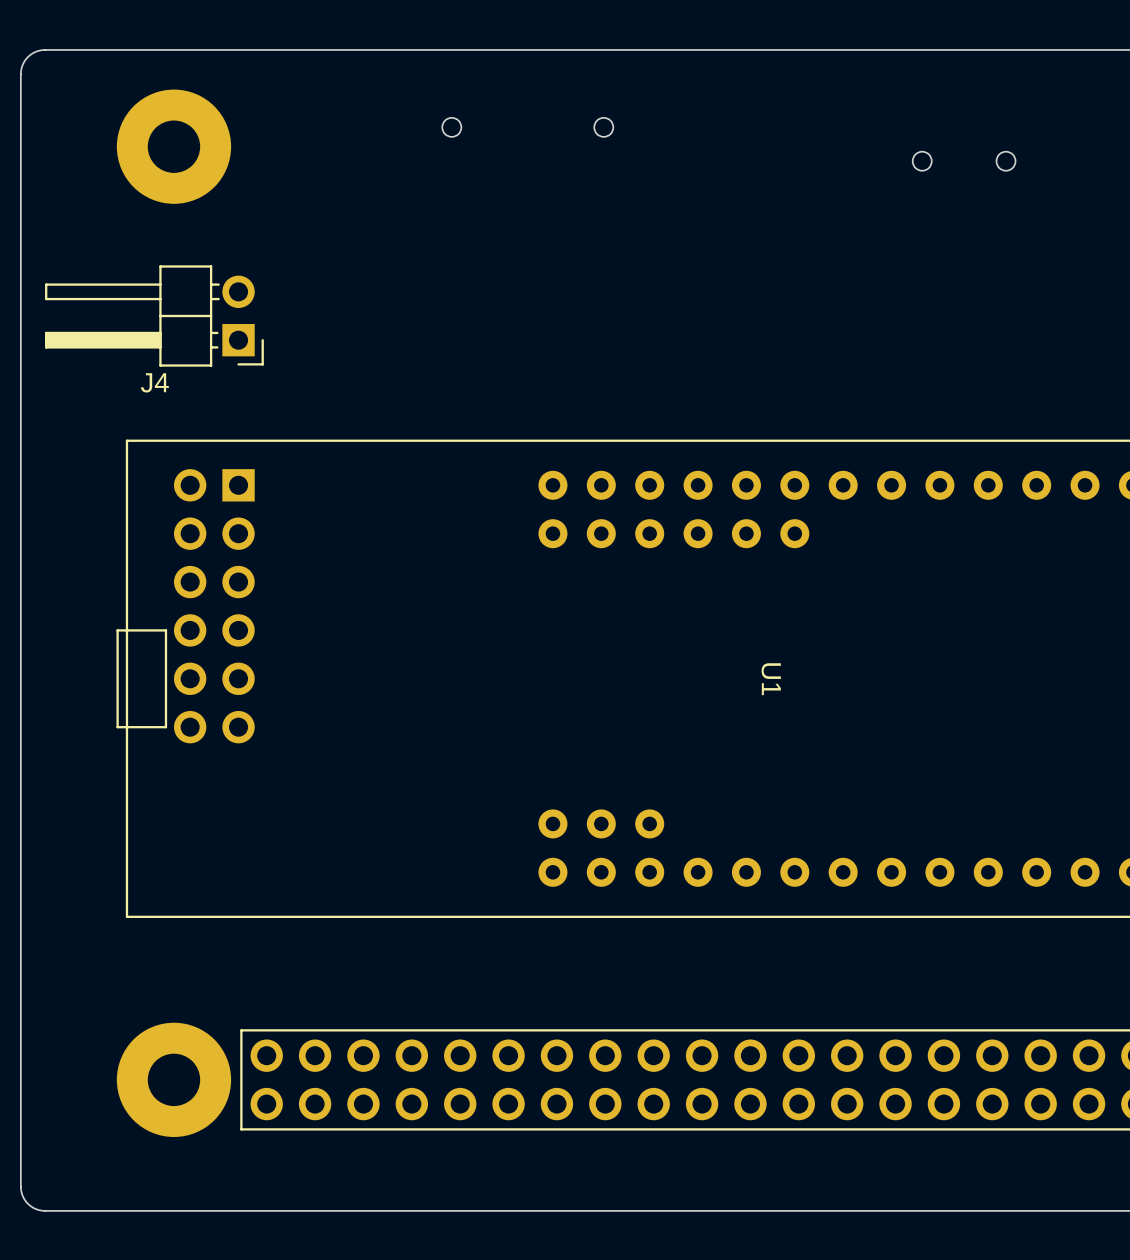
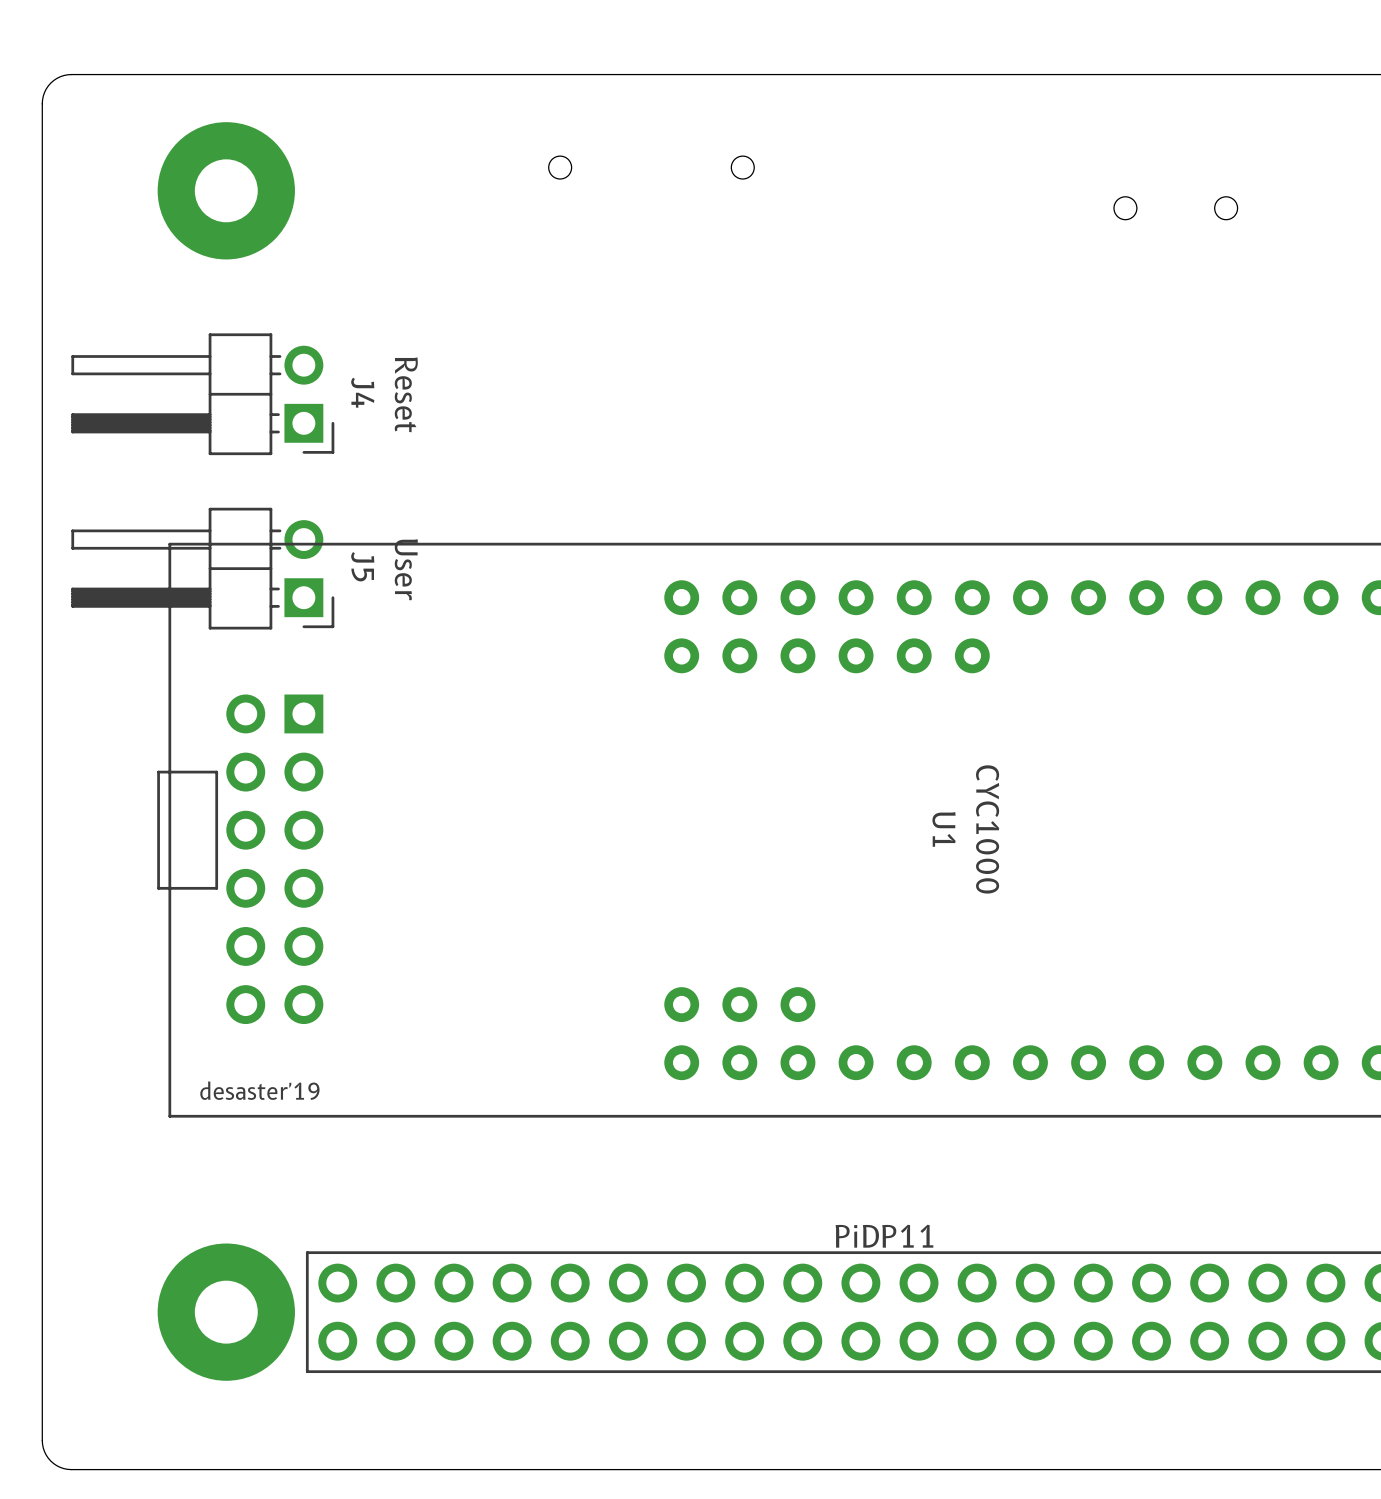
text: none -> Reset (406, 394)
J4 name rotation: 0° (154, 382) -> 90° clockwise (362, 392)
J4 name position: J4 (154, 382) -> J4 (362, 392)
J5: none -> (202, 568)
text: none -> User (406, 569)
part position: (214, 606) -> (274, 859)
text: none -> CYC1000 (987, 829)
text: none -> desaster'19 (259, 1090)
text: none -> PiDP11 (884, 1236)

